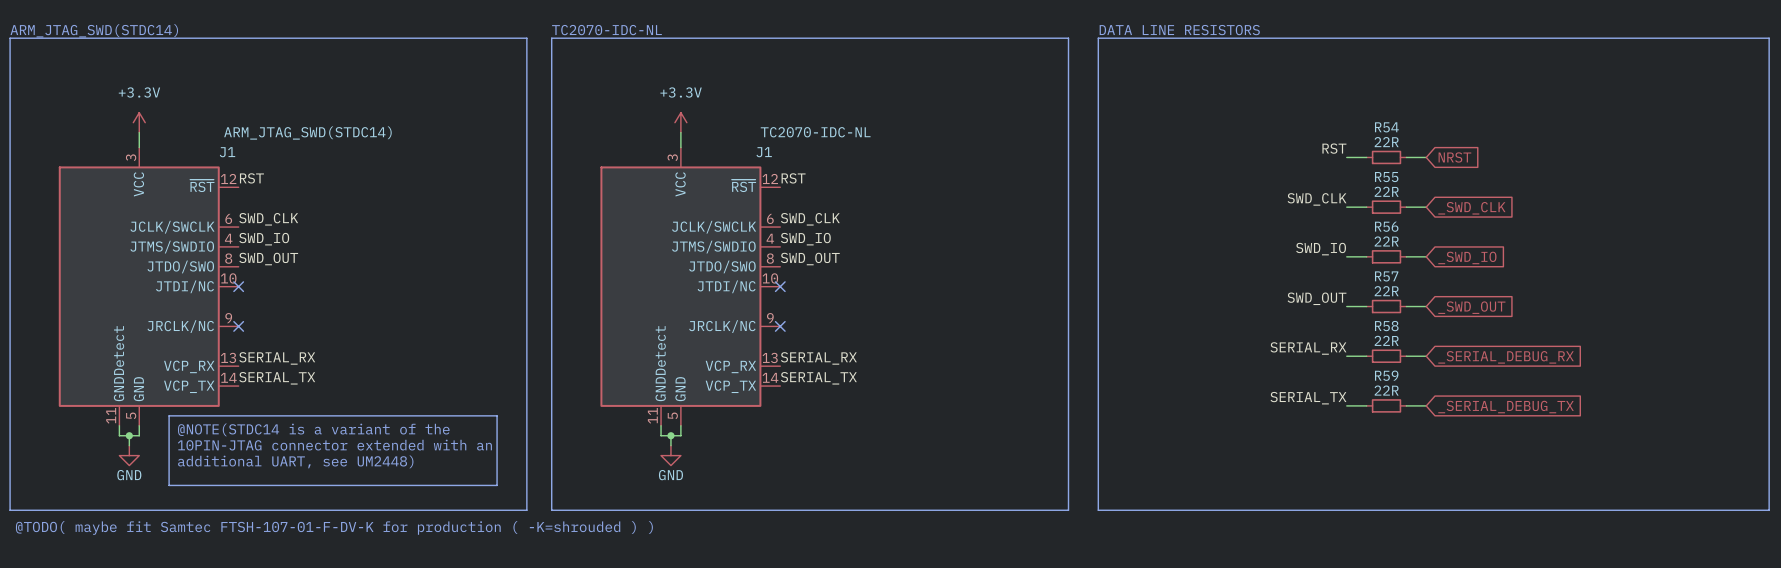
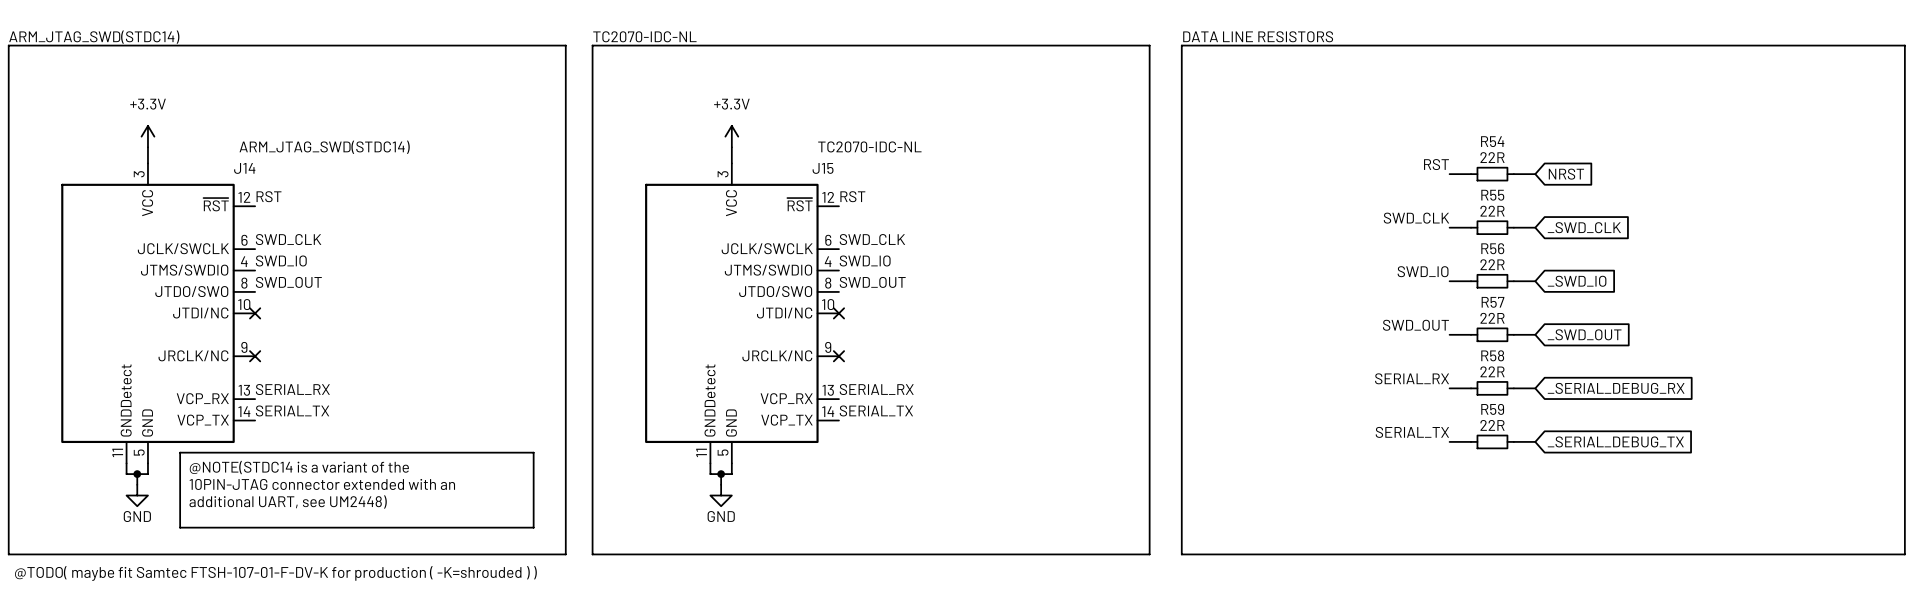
J1 name: J1 (227, 152) -> J14 (244, 168)
J1 name: J1 (764, 152) -> J15 (823, 168)

